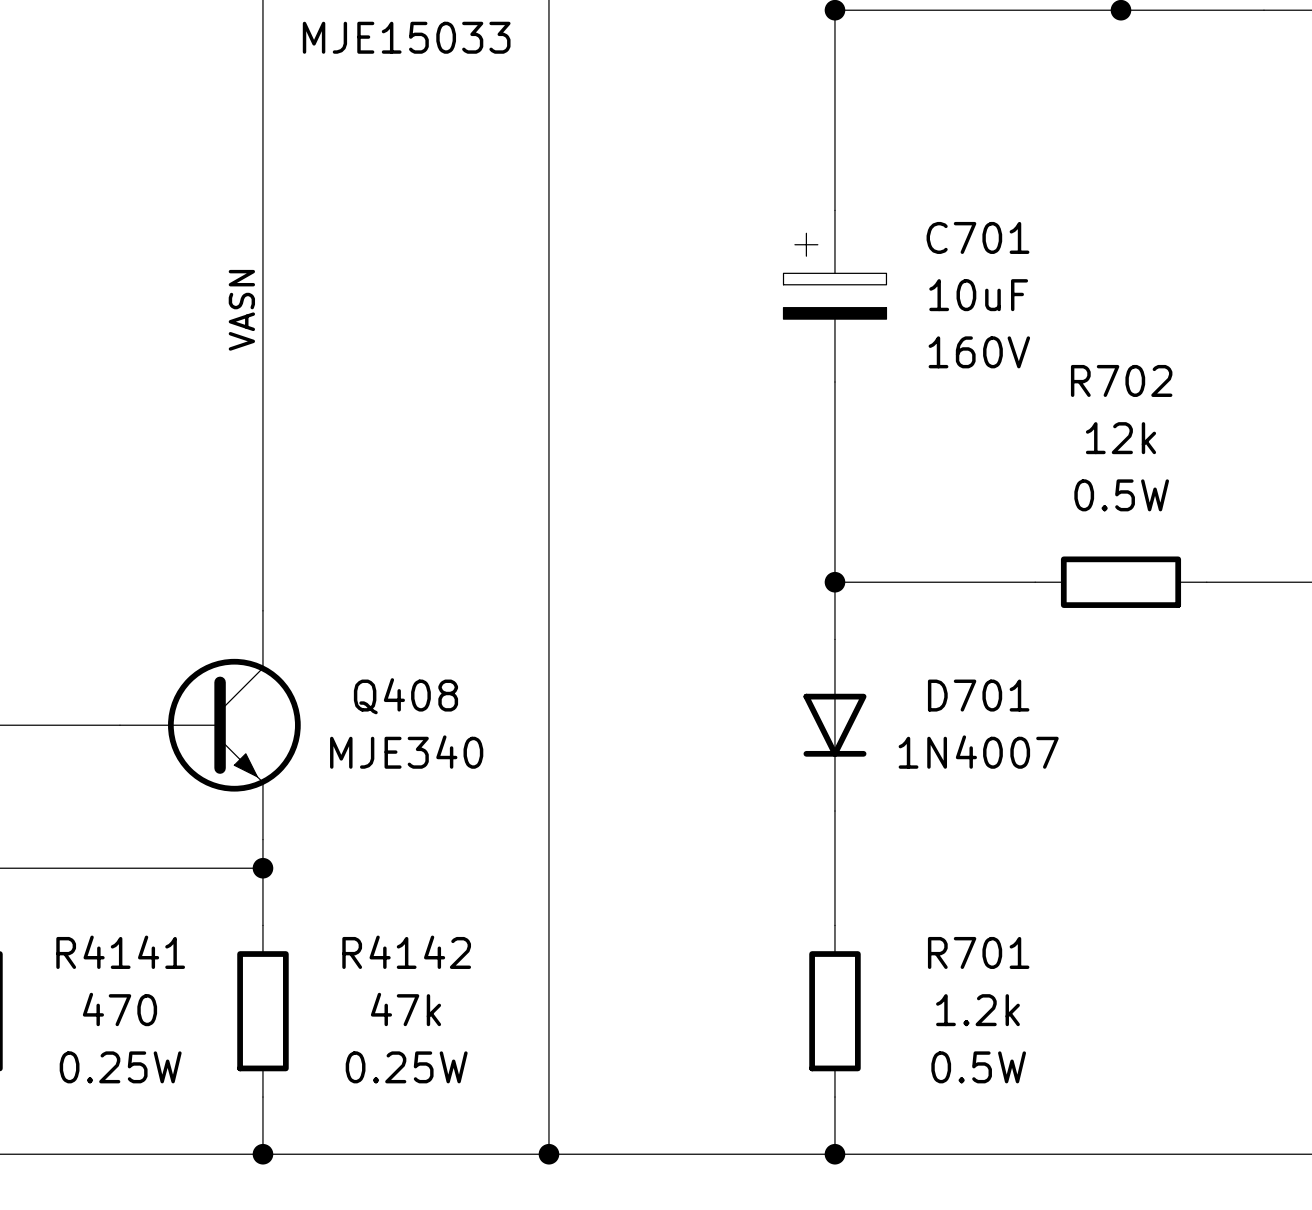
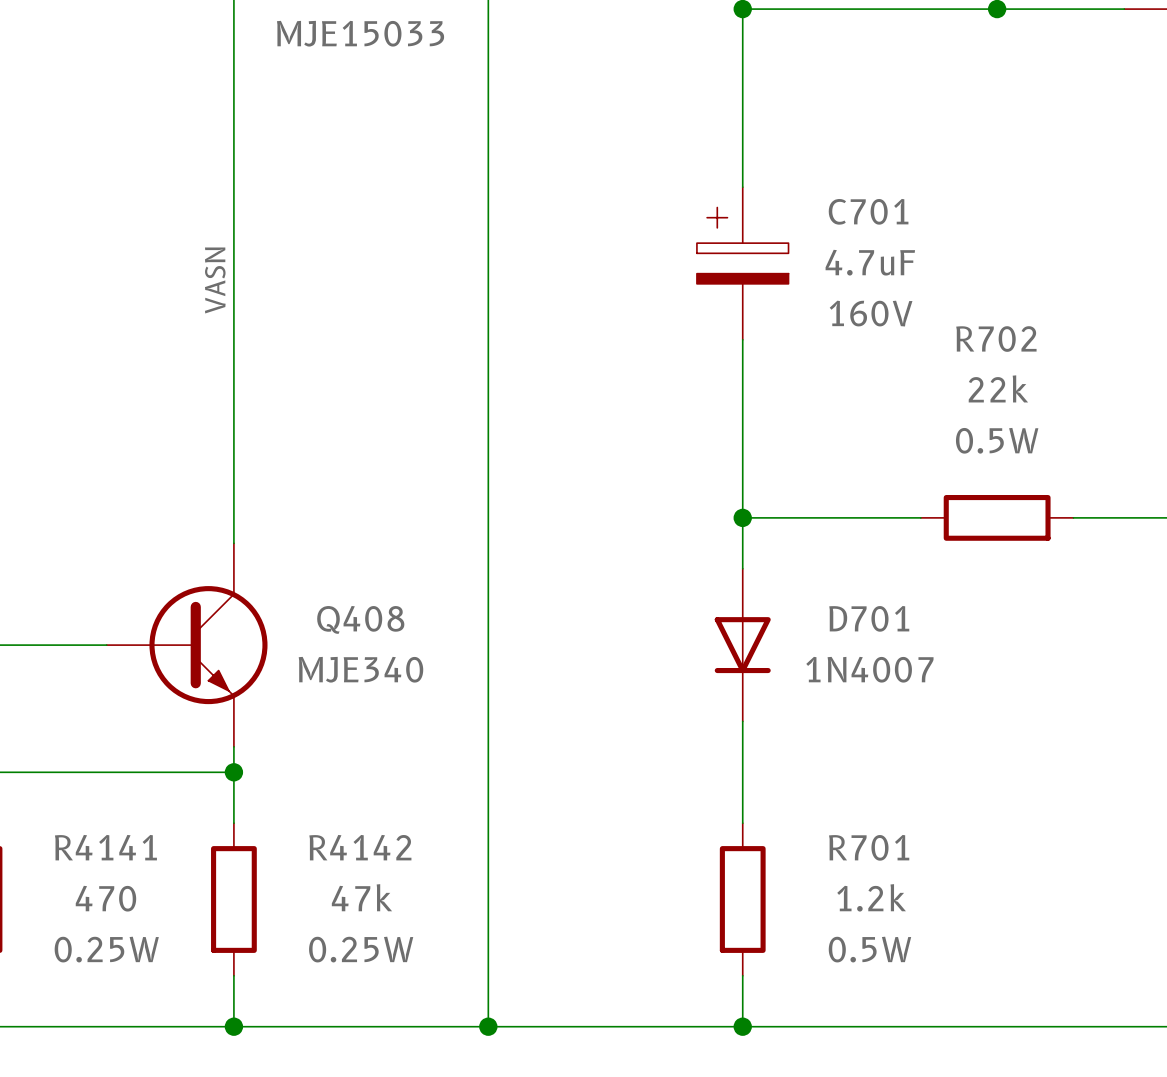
C701 value: 10uF (978, 295) -> 4.7uF (870, 262)
R702 value: 12k (1120, 438) -> 22k (998, 388)

